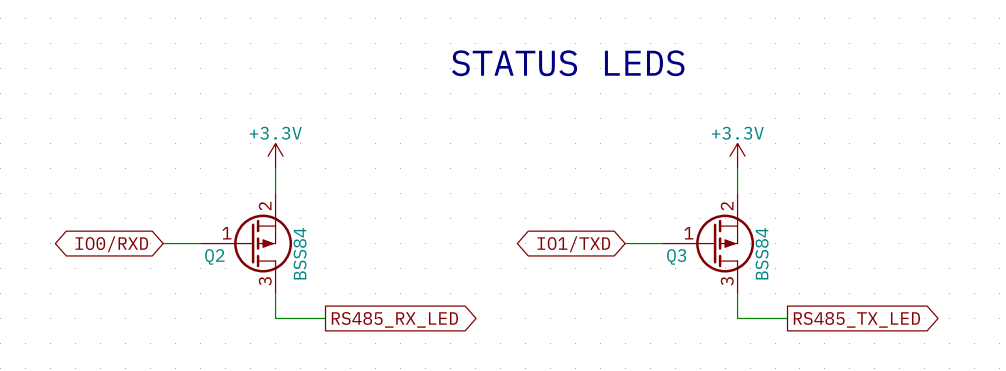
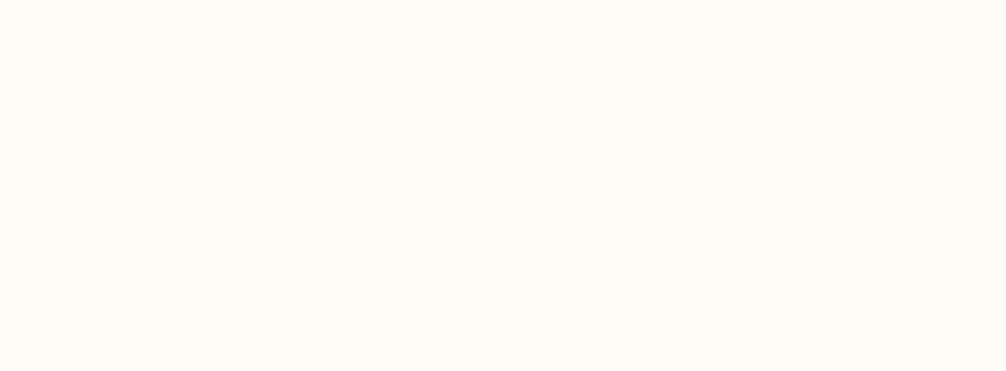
text: STATUS LEDS (568, 63) -> none
power symbol: +3.3V (275, 156) -> none
power symbol: +3.3V (737, 156) -> none
wire: (275, 168) (275, 193) -> none
wire: (737, 168) (737, 193) -> none
wire: (163, 243) (200, 243) -> none
Q2: BSS84 (246, 243) -> none
wire: (625, 243) (662, 243) -> none
Q3: BSS84 (708, 243) -> none
global label: IO0/RXD (111, 244) -> none
global label: IO1/TXD (573, 244) -> none
wire: (275, 293) (275, 318) (325, 318) -> none
wire: (737, 293) (737, 318) (787, 318) -> none
global label: RS485_RX_LED (394, 319) -> none
global label: RS485_TX_LED (856, 319) -> none

